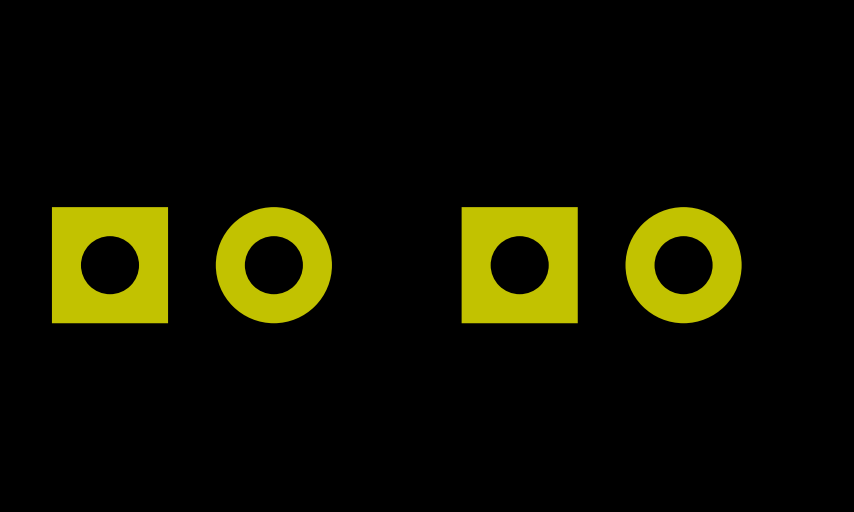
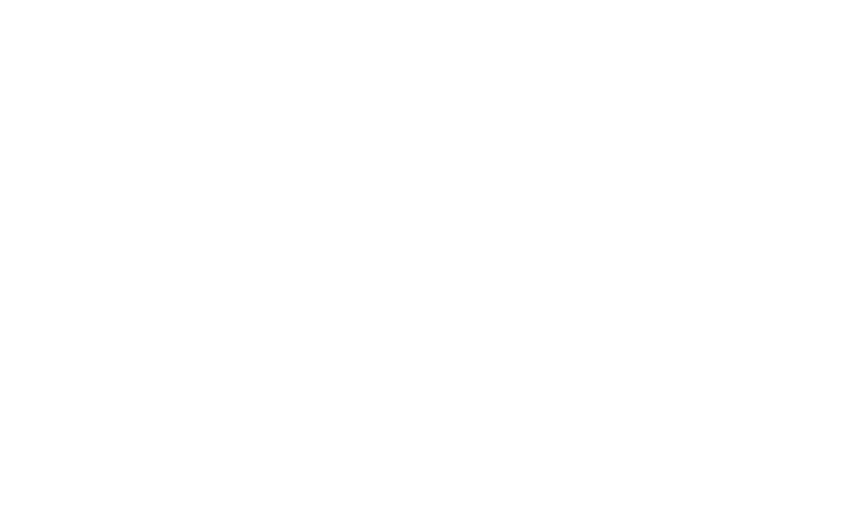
part: (191, 265) -> none
part: (601, 265) -> none

